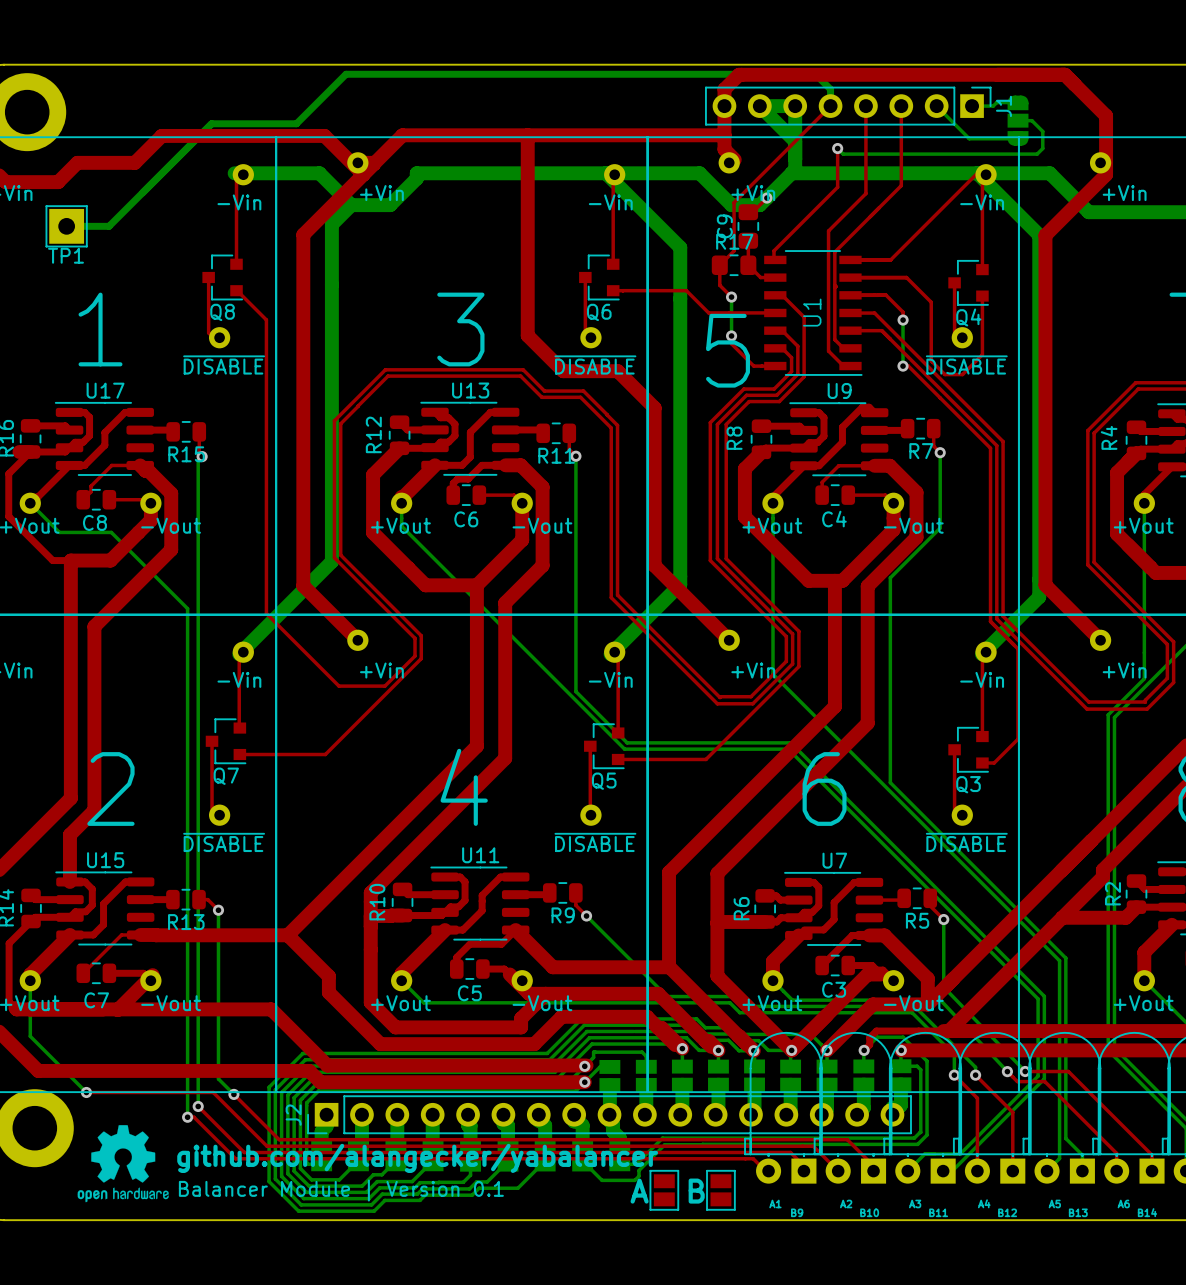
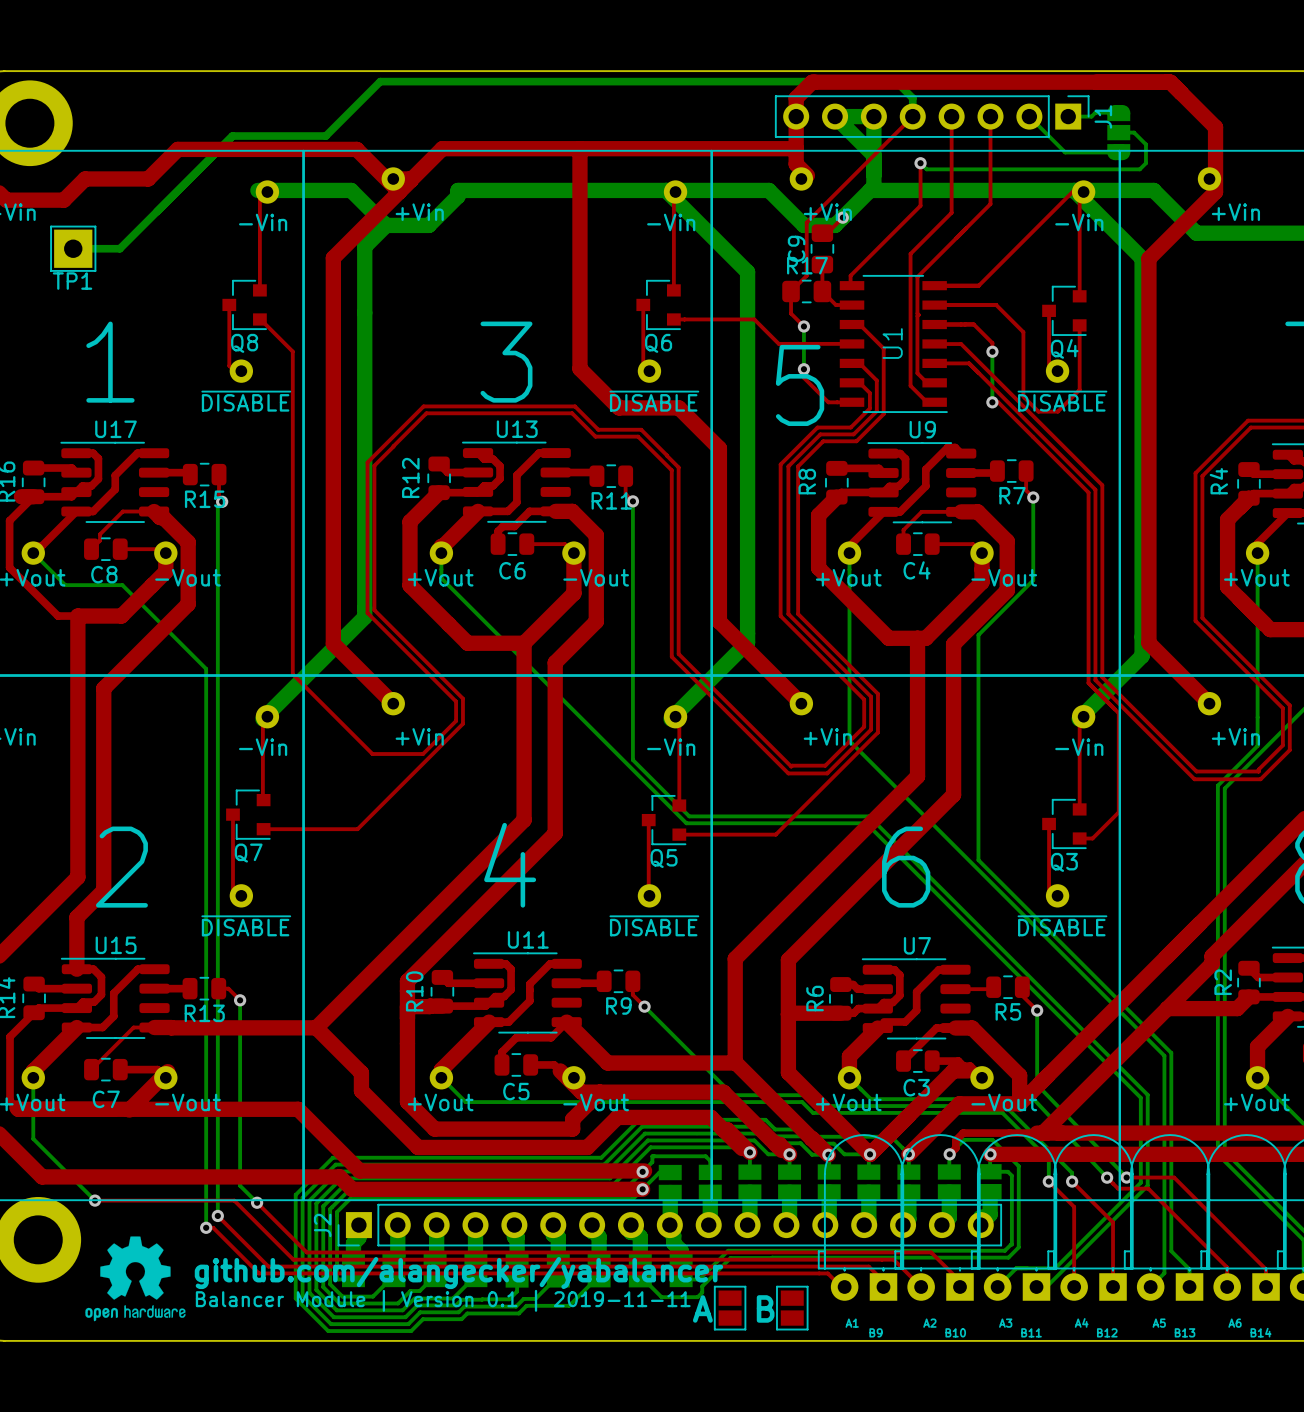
text: Balancer Module | Version 0.1 (341, 1190) -> Balancer Module | Version 0.1 | 2019-11-11 (443, 1300)

